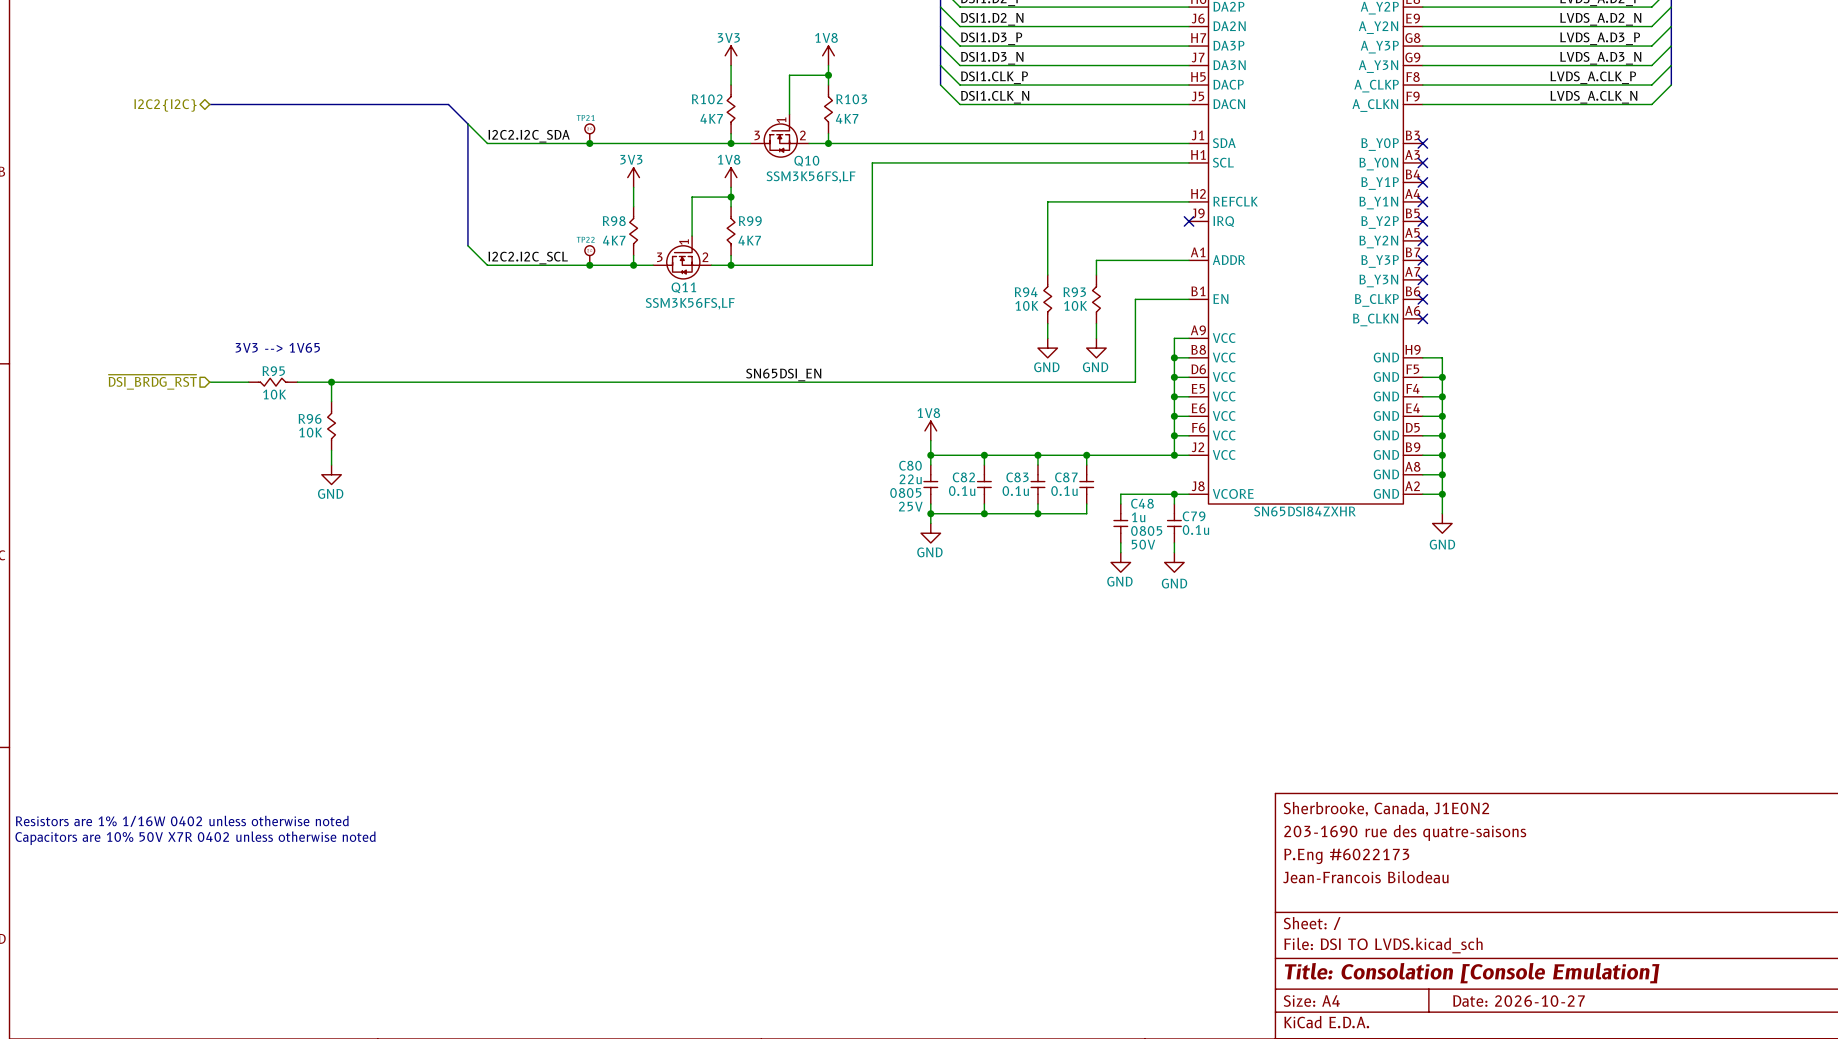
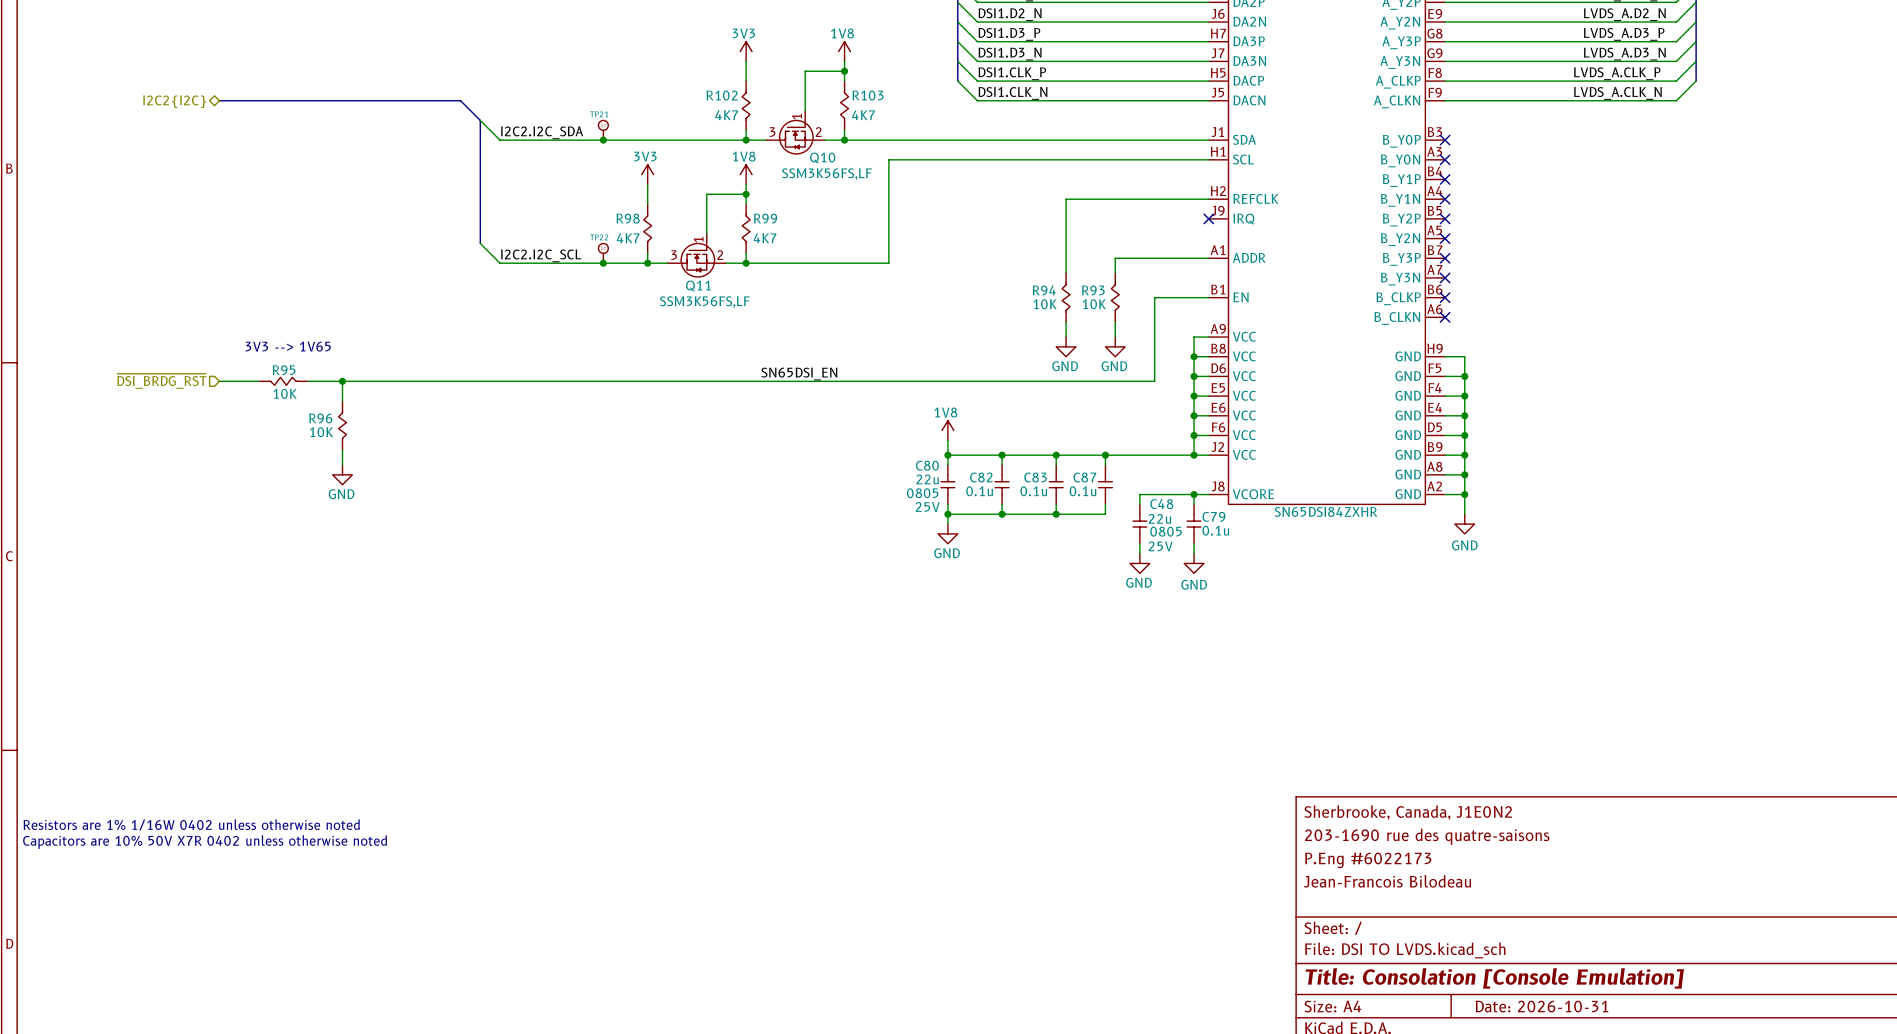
C48 value: 1u (1138, 517) -> 22u (1159, 518)
C48 text: 50V (1143, 544) -> 25V (1160, 546)
title block: Date: 2026-10-27 (1518, 1001) -> Date: 2026-10-31 (1541, 1006)

